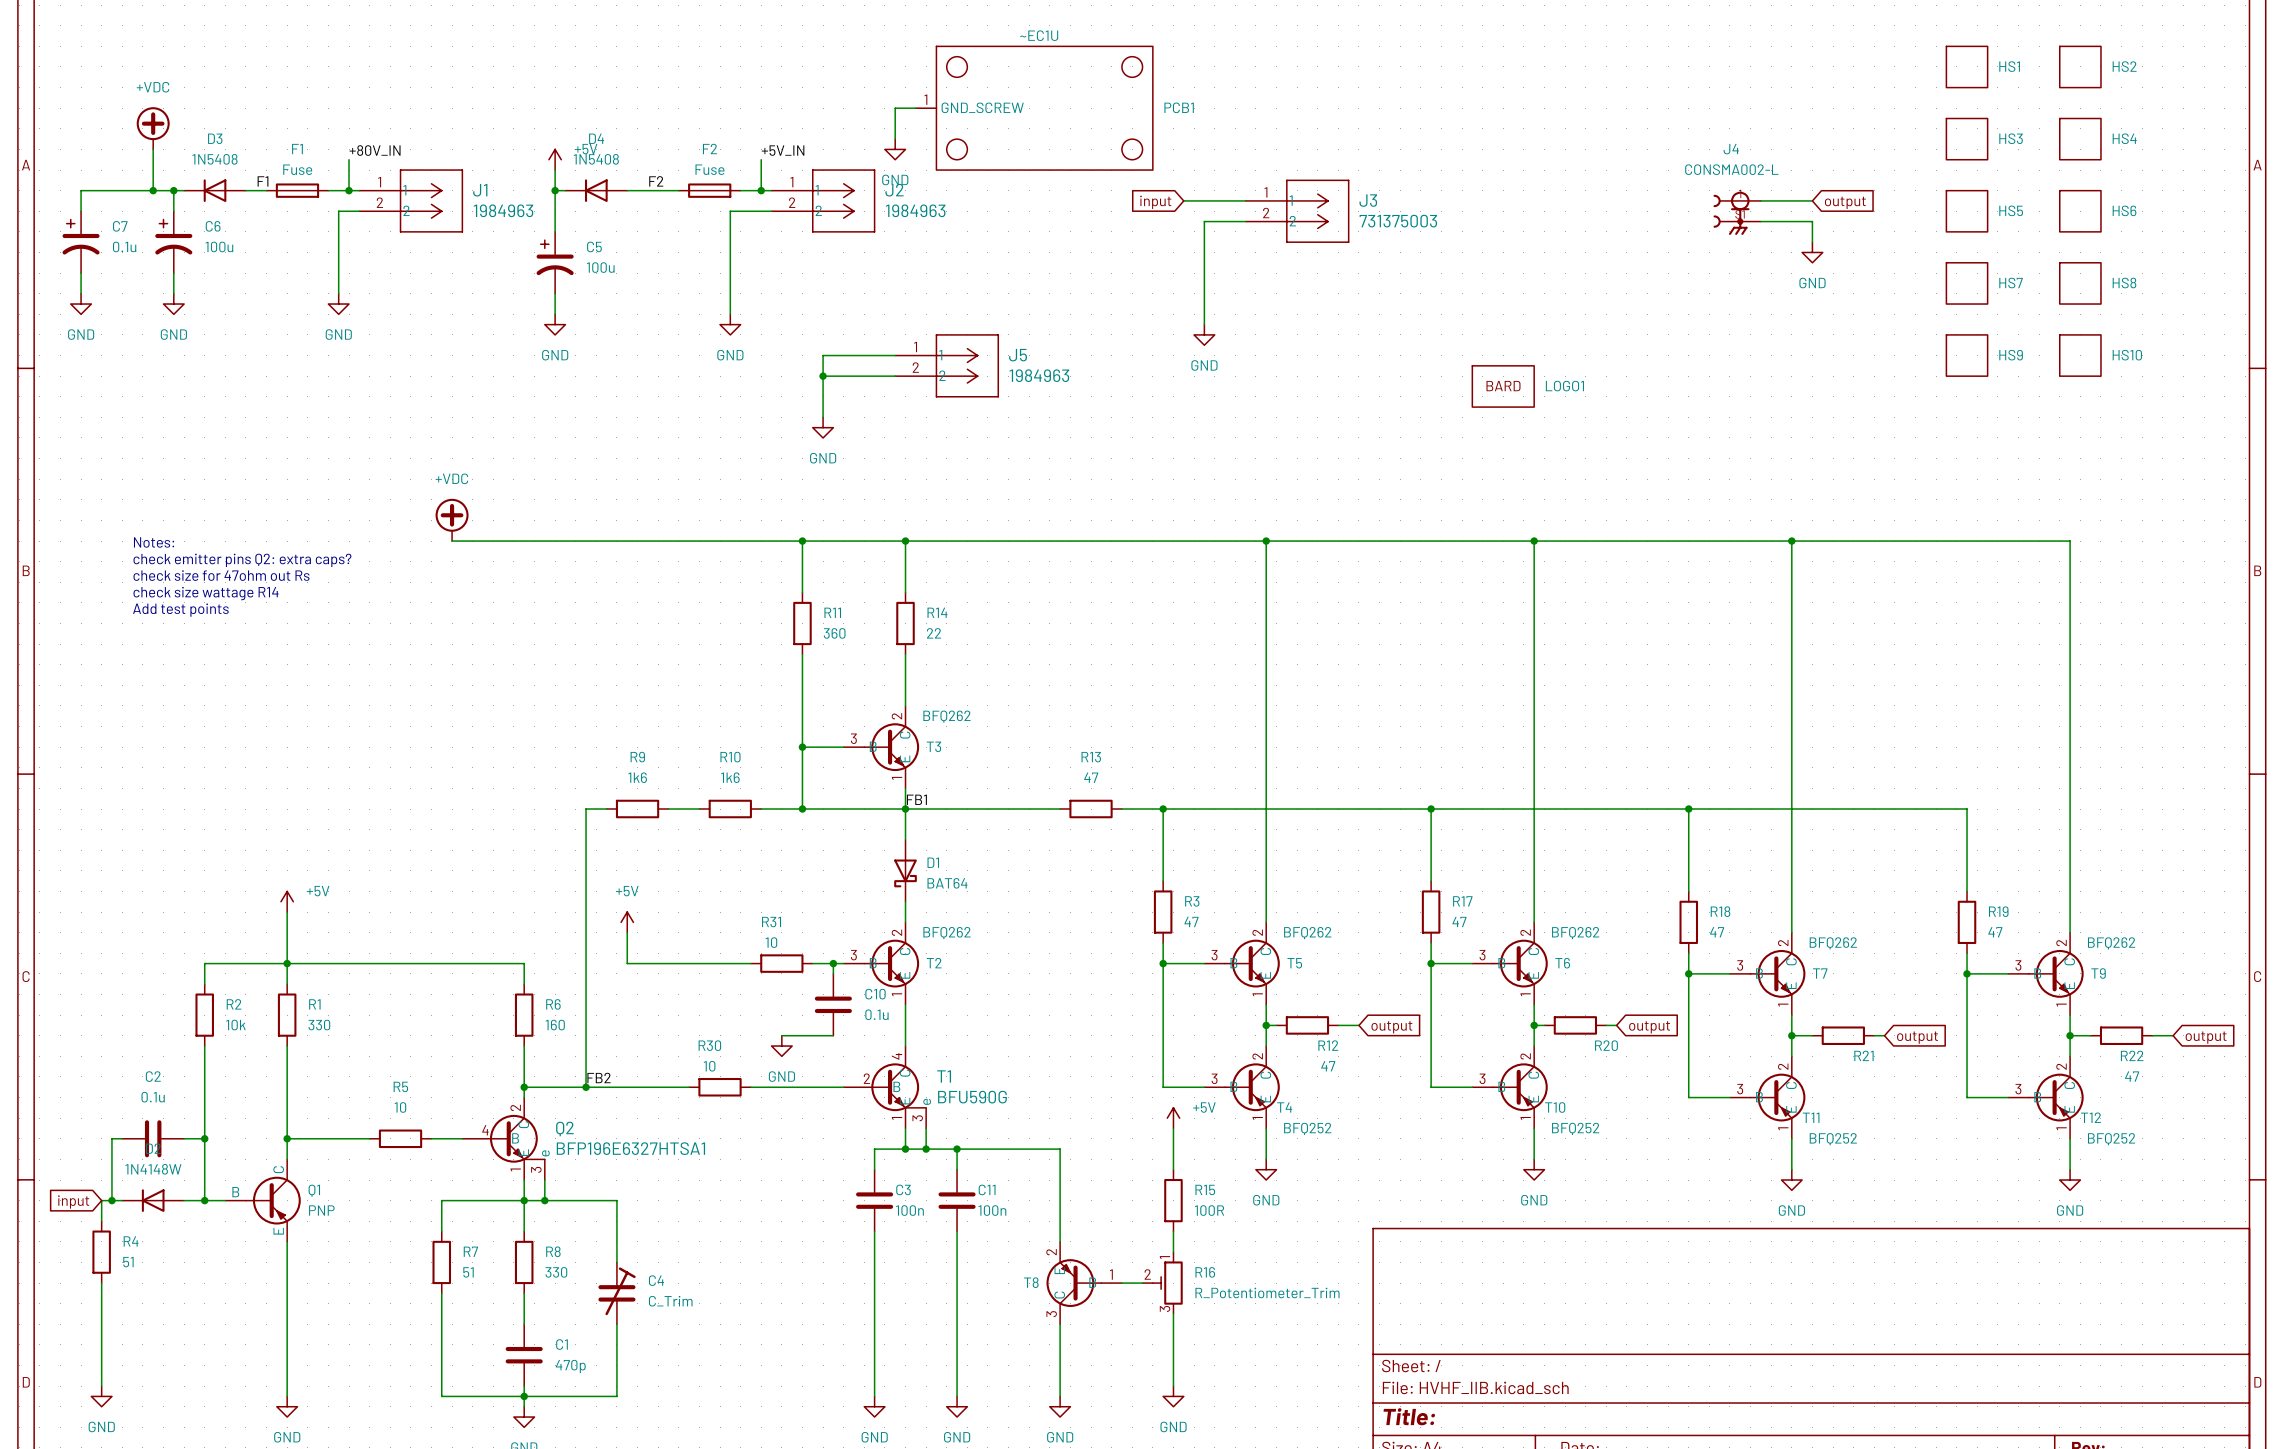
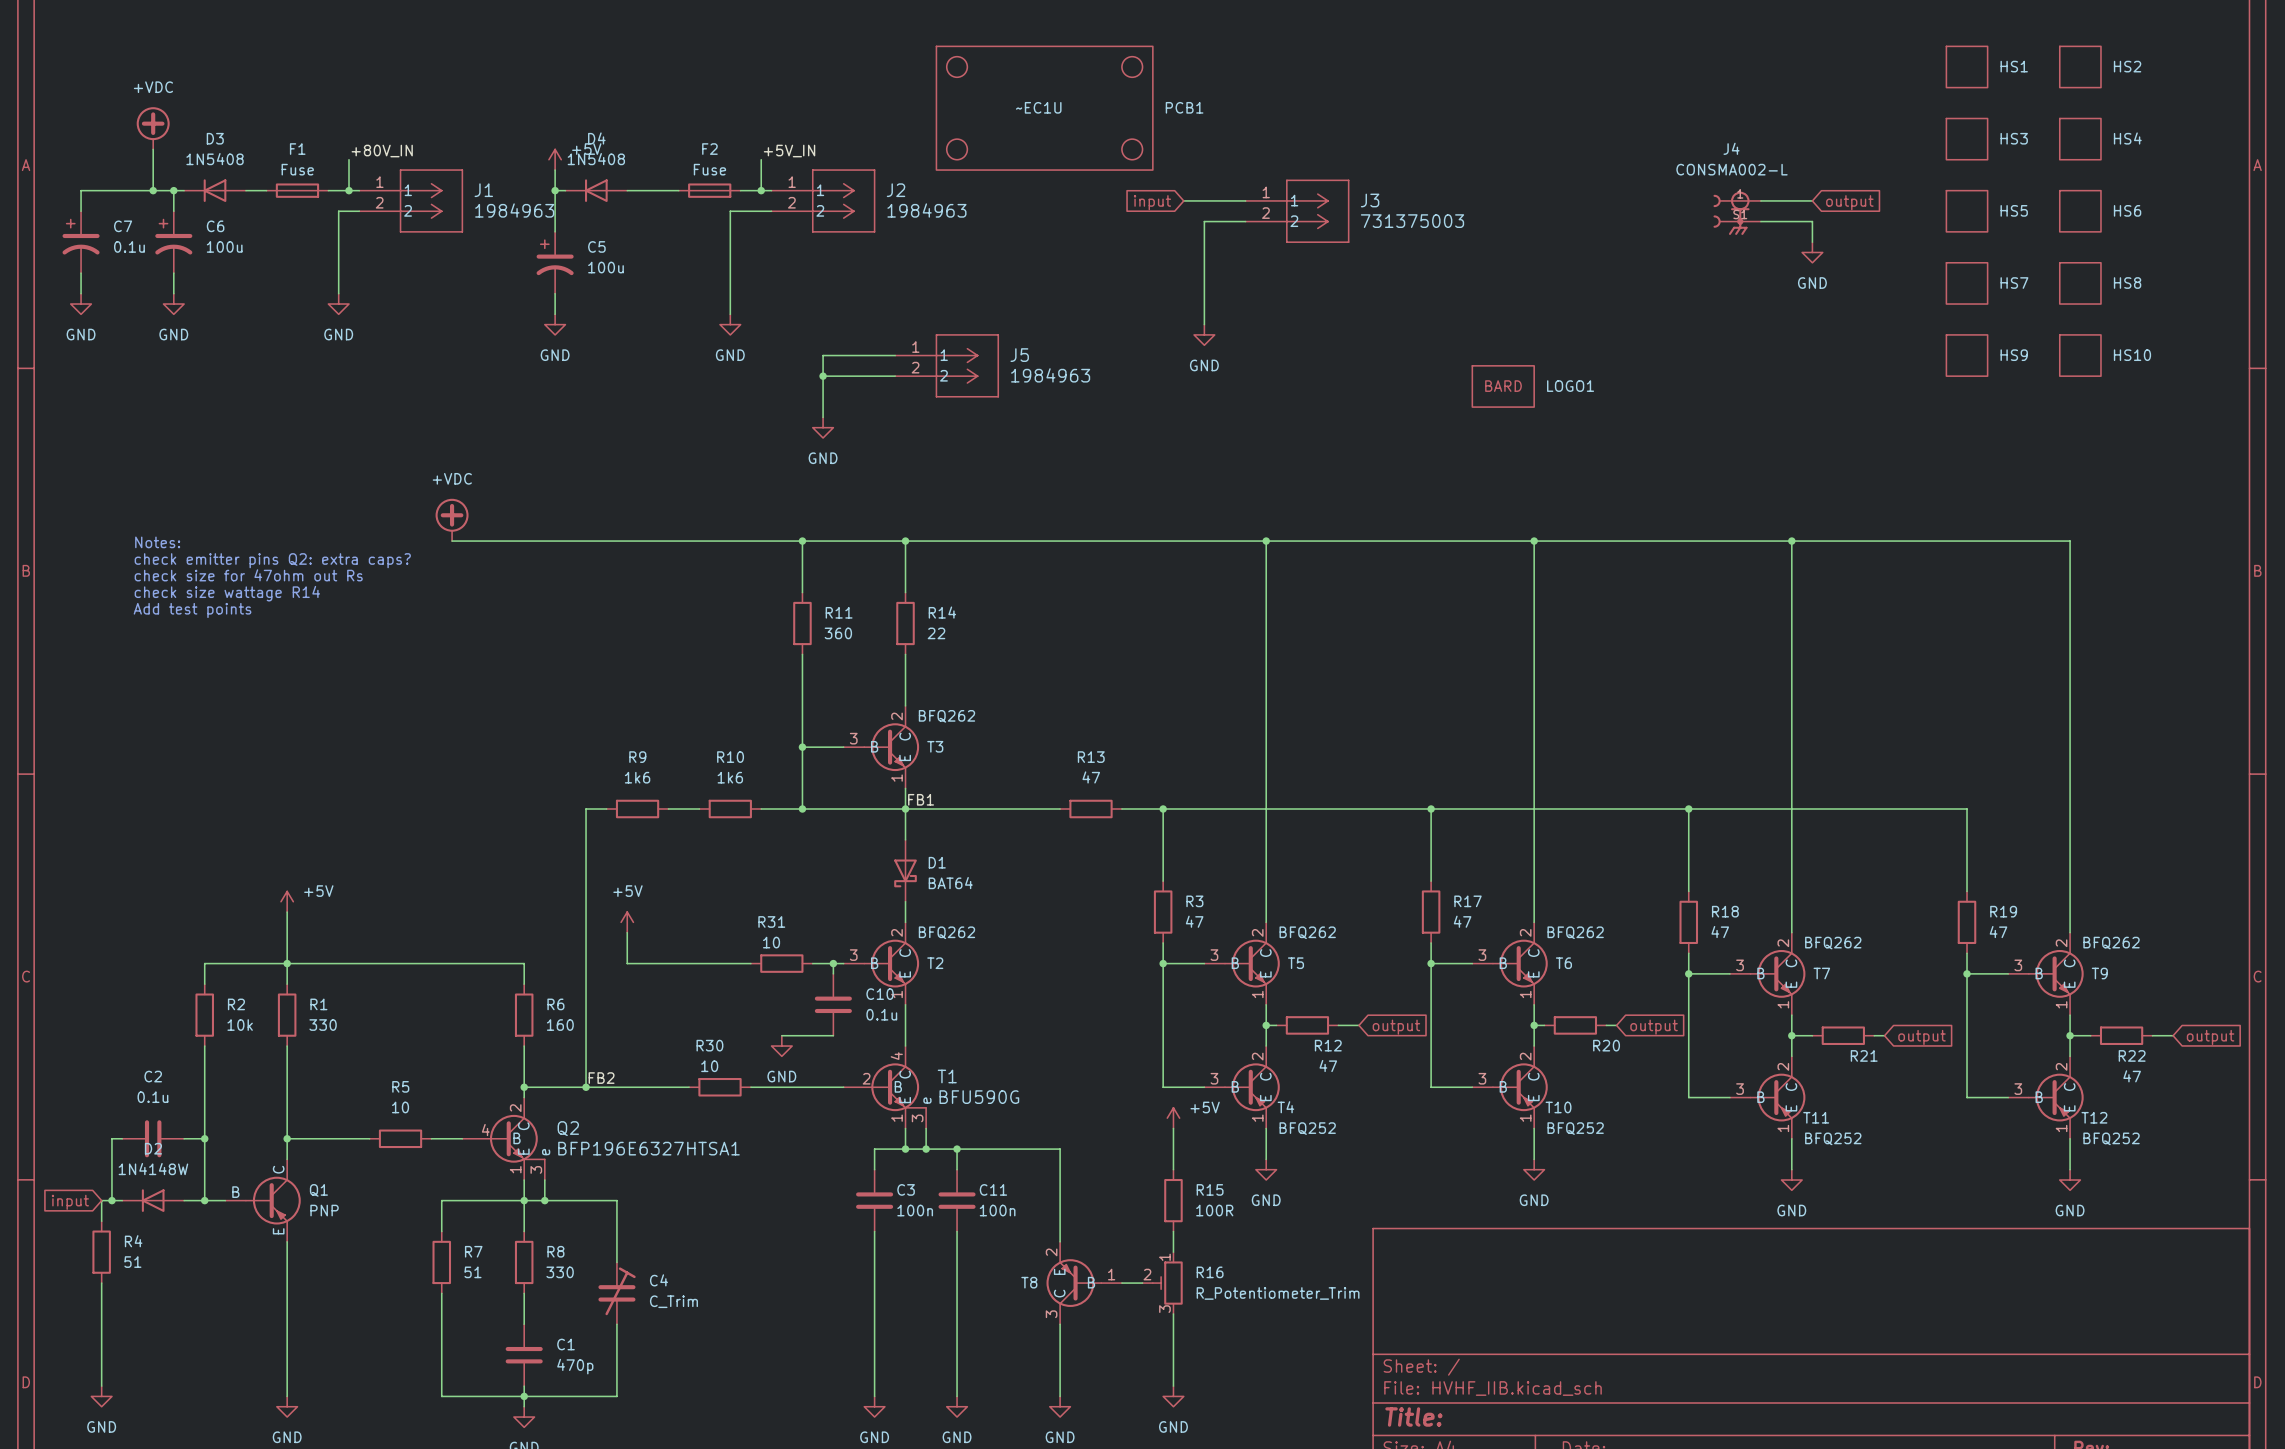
PCB1 value position: ~EC1U (1039, 35) -> ~EC1U (1038, 107)
PCB1 symbol: [915, 46, 1153, 171] -> [936, 46, 1153, 171]
wire: (915, 108) (895, 108) (895, 139) -> none
power symbol: GND (895, 149) -> none
label: F1 (263, 181) -> none
label: F2 (656, 181) -> none

